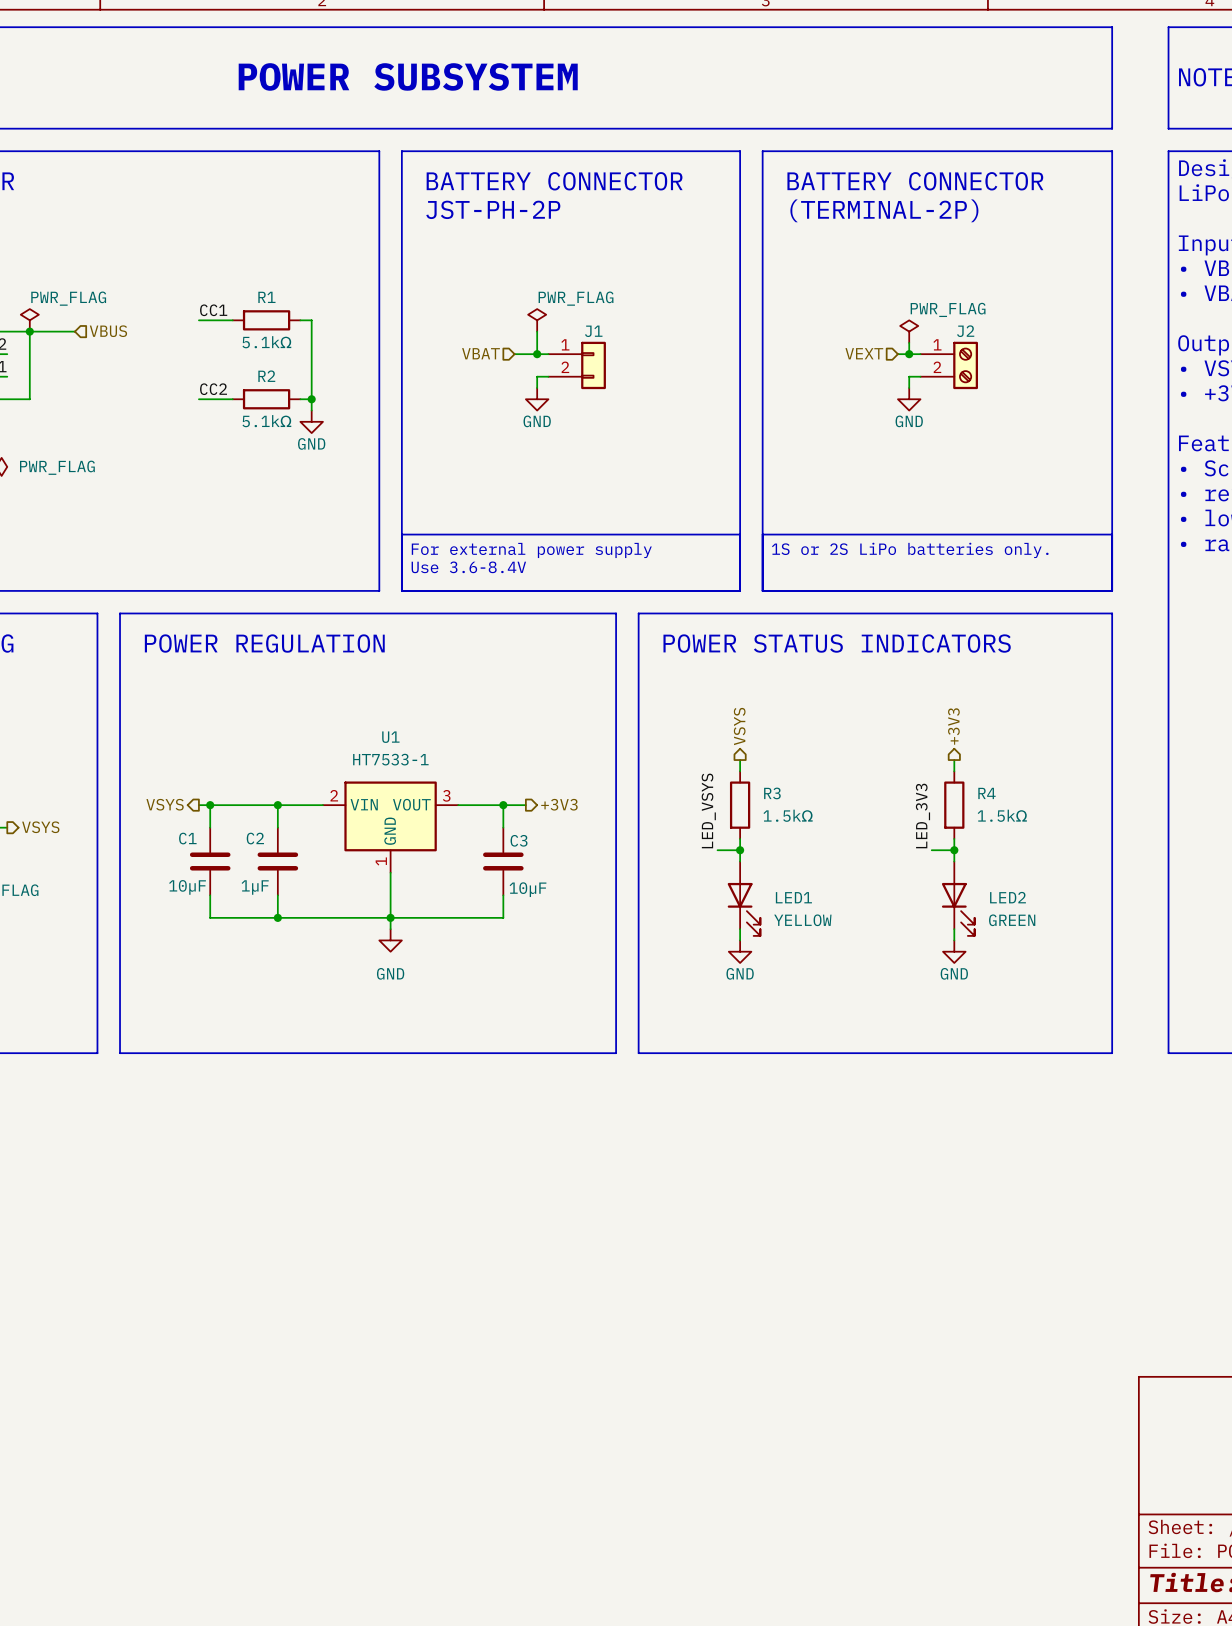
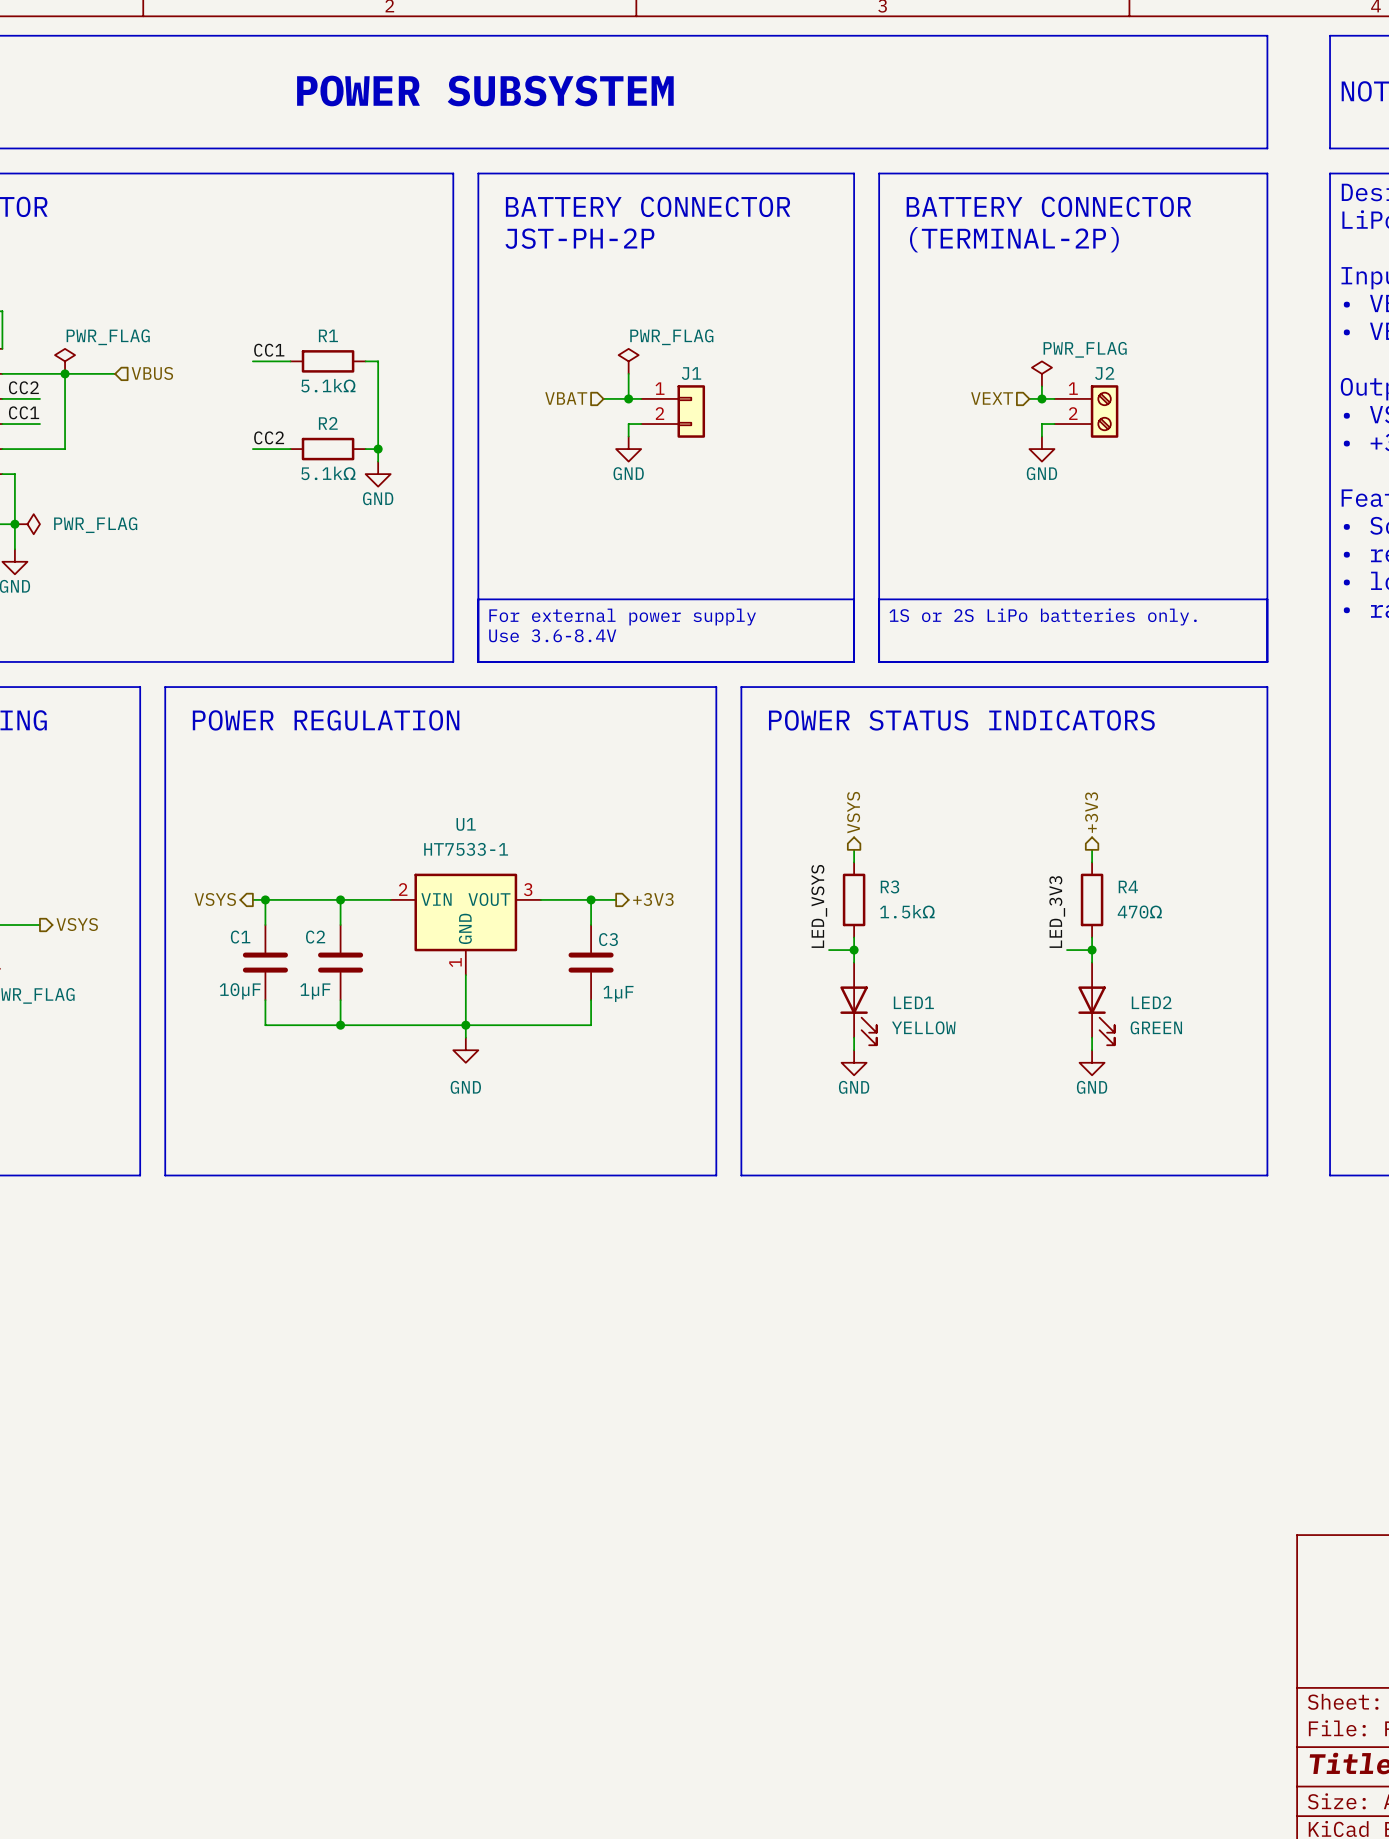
R4 value: 1.5kΩ (1002, 815) -> 470Ω (1139, 912)
C3 value: 10µF (528, 889) -> 1µF (618, 993)

